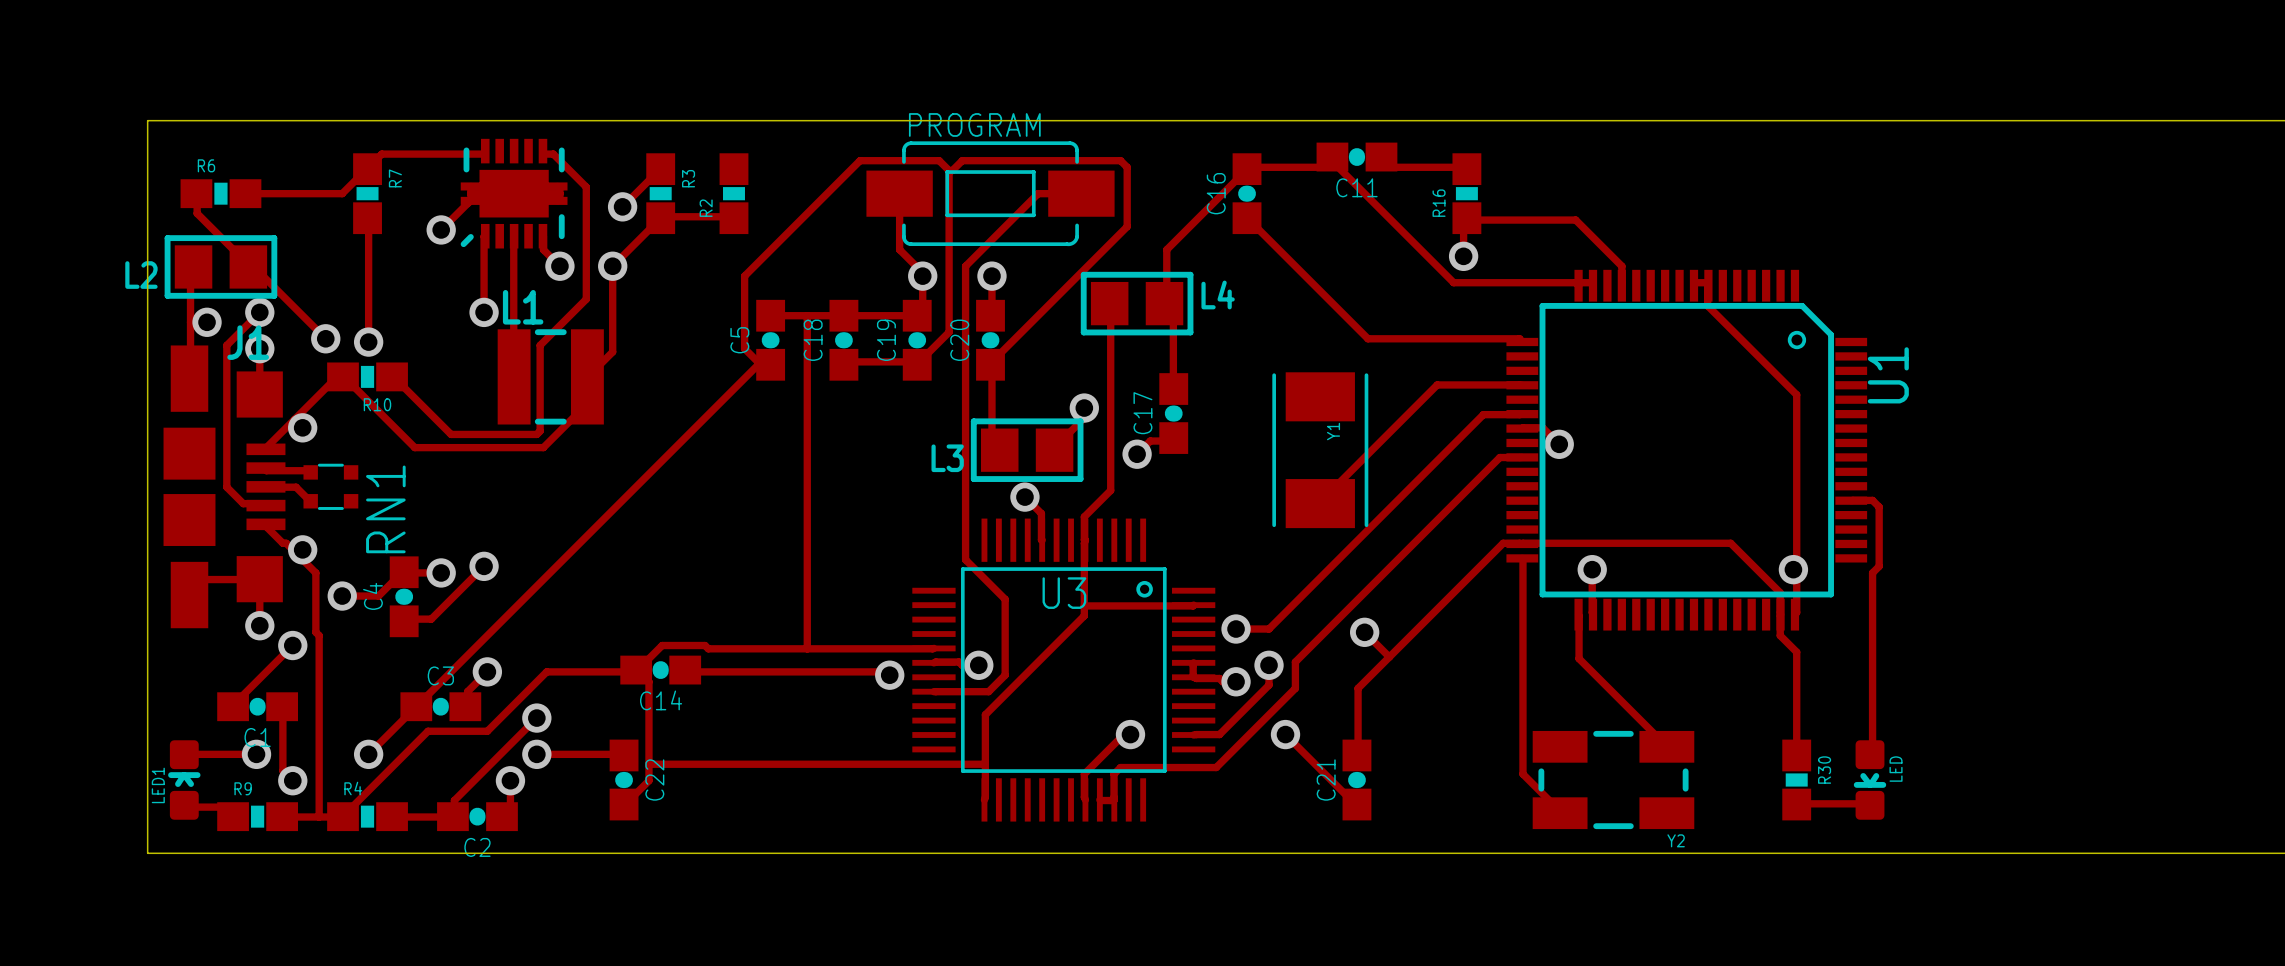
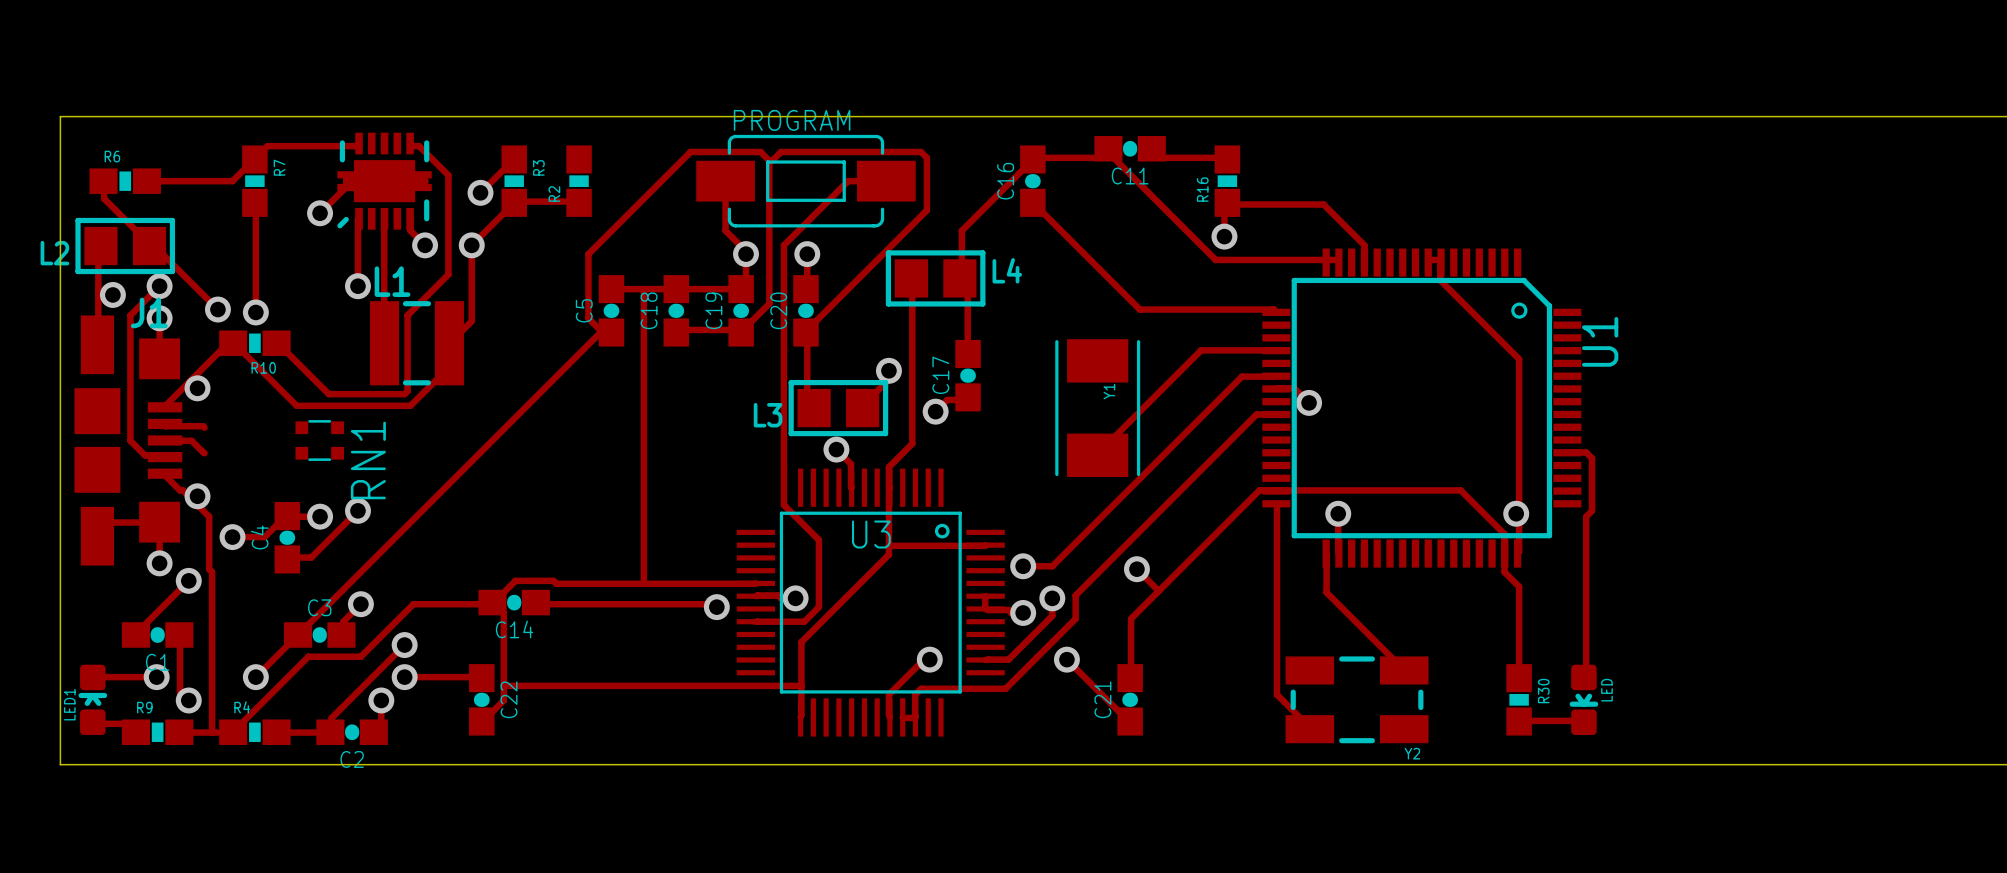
RN1 position: (330, 486) -> (319, 440)

